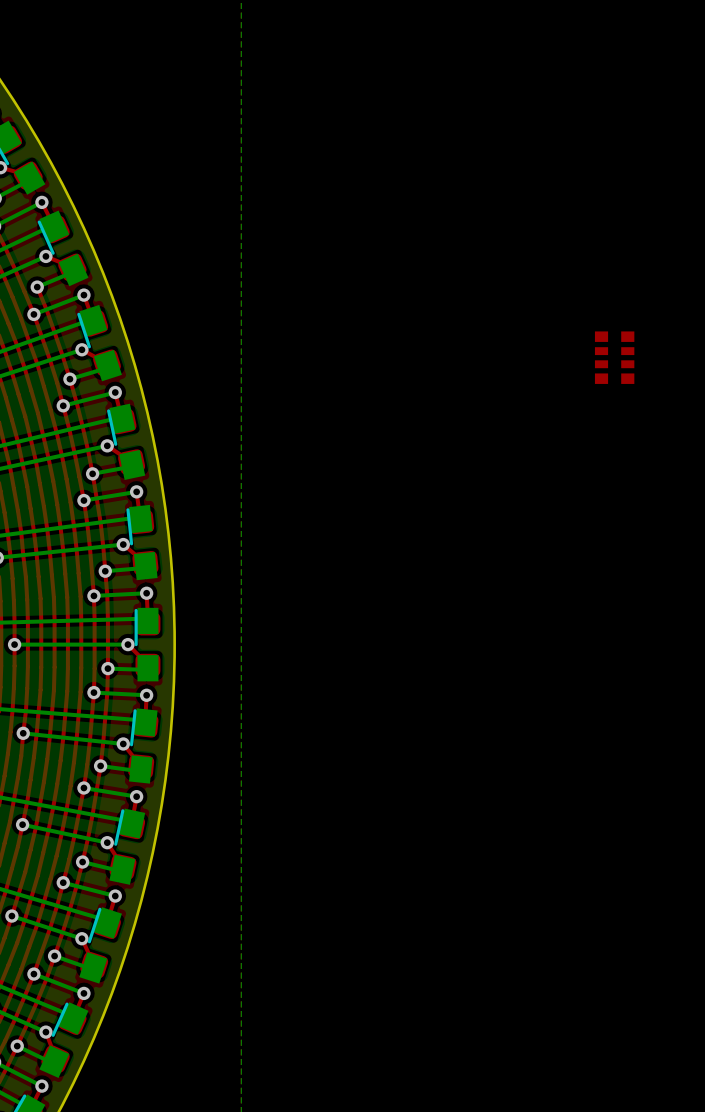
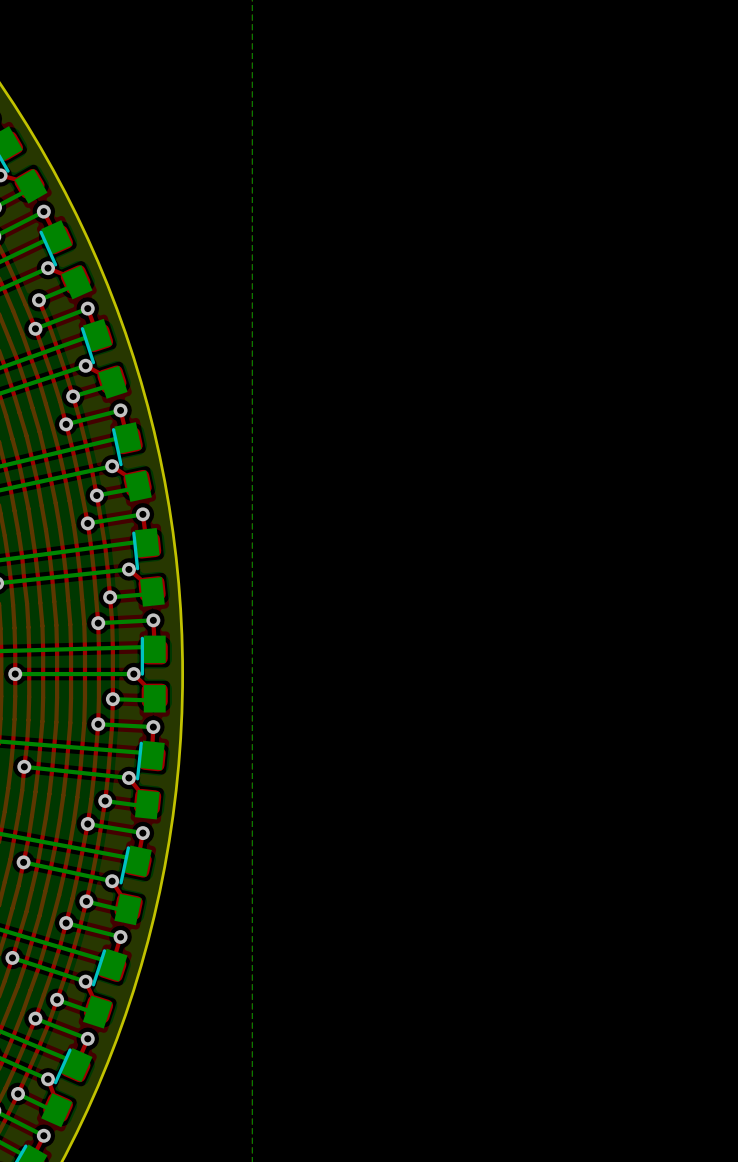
part: (614, 357) -> none

